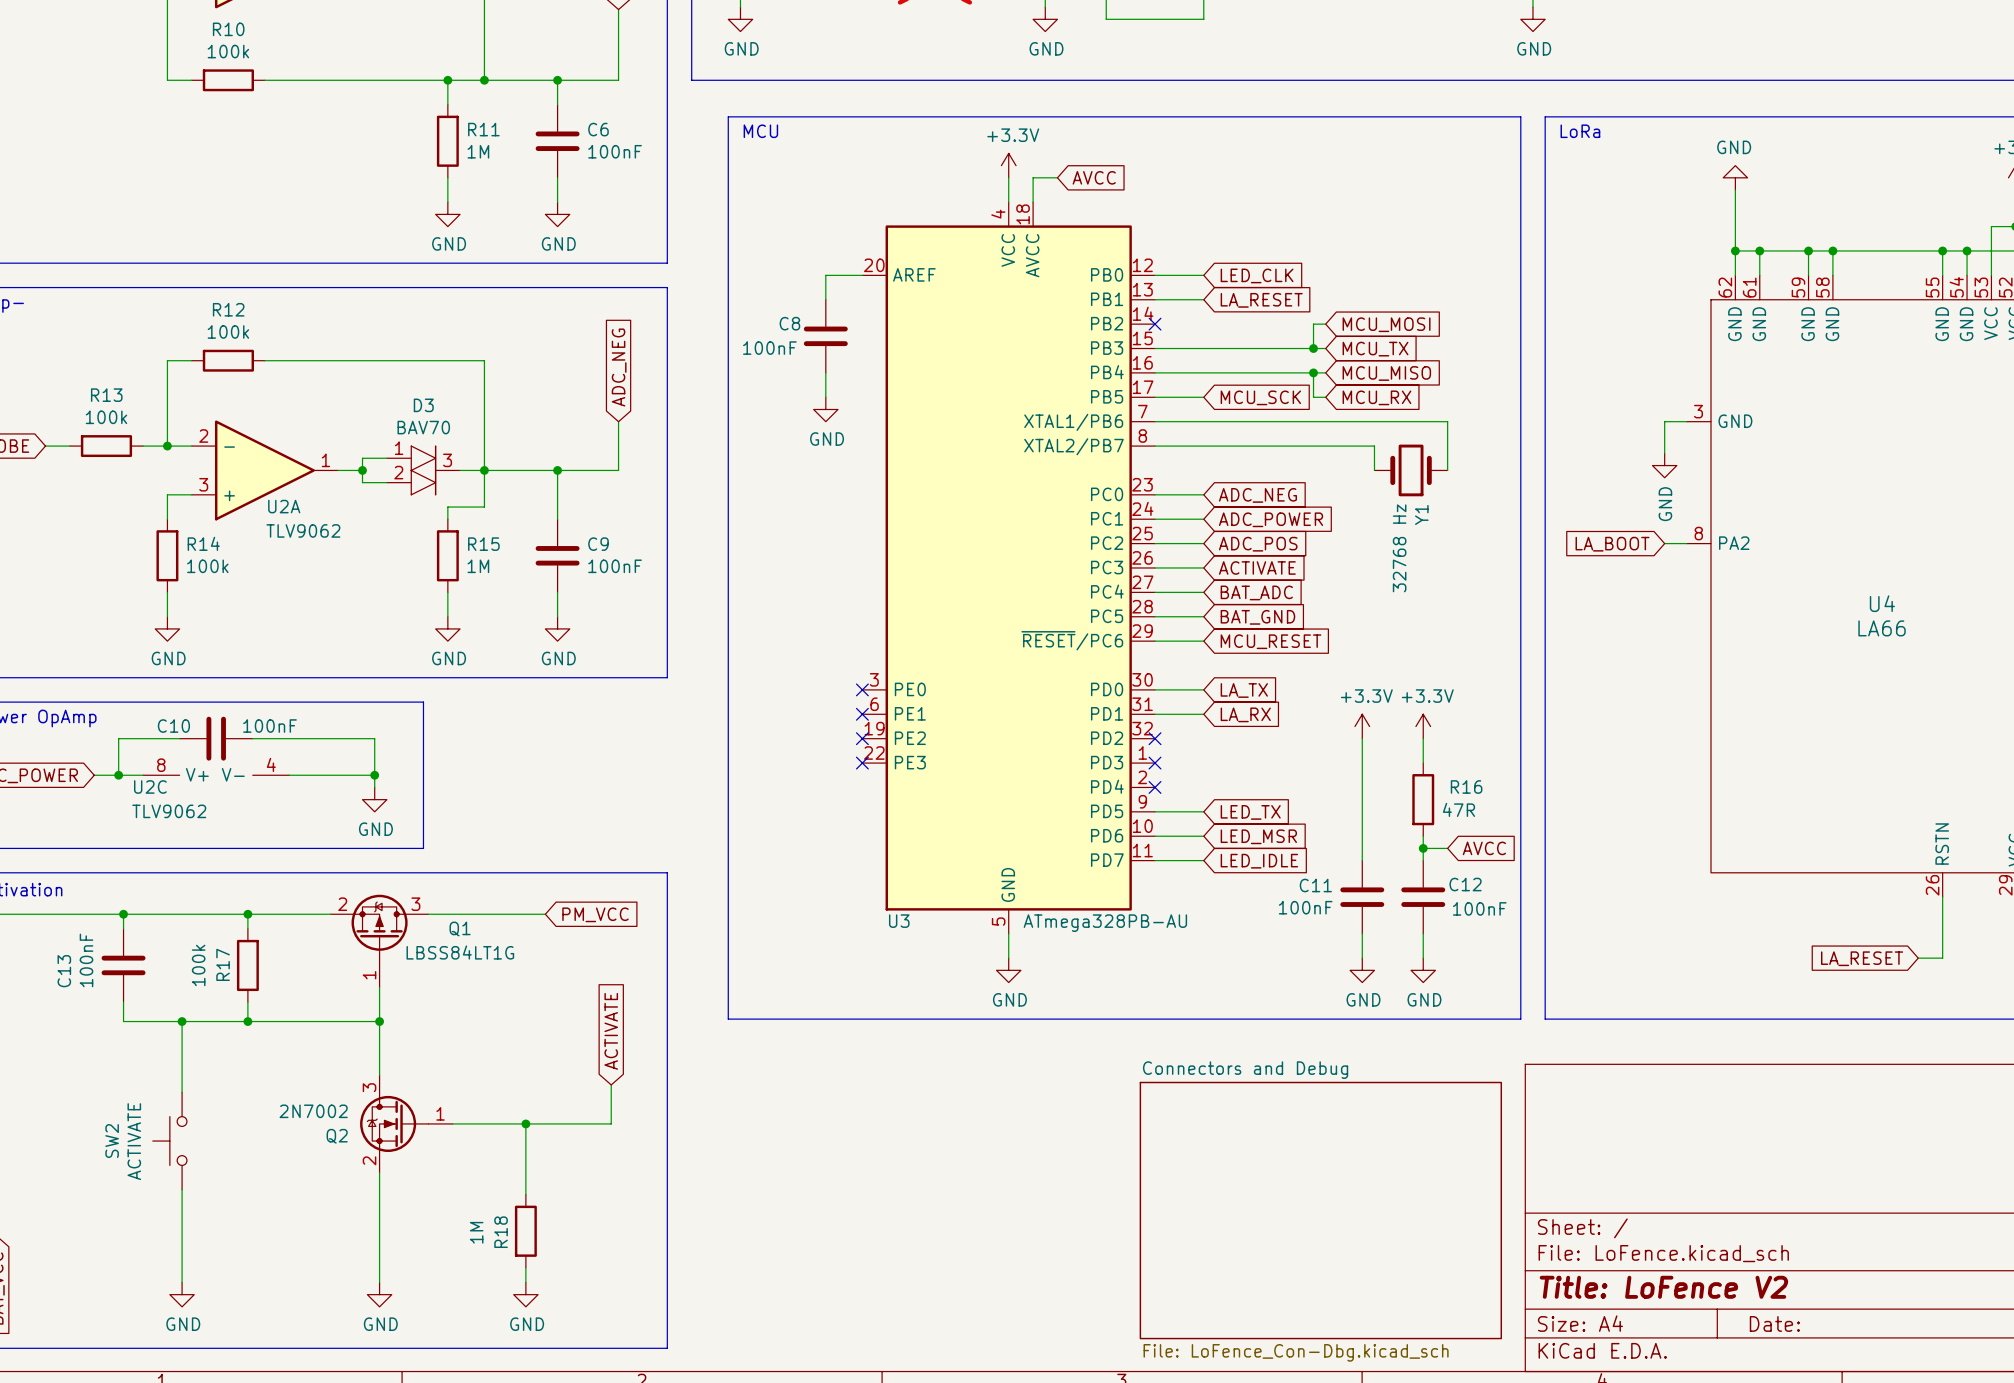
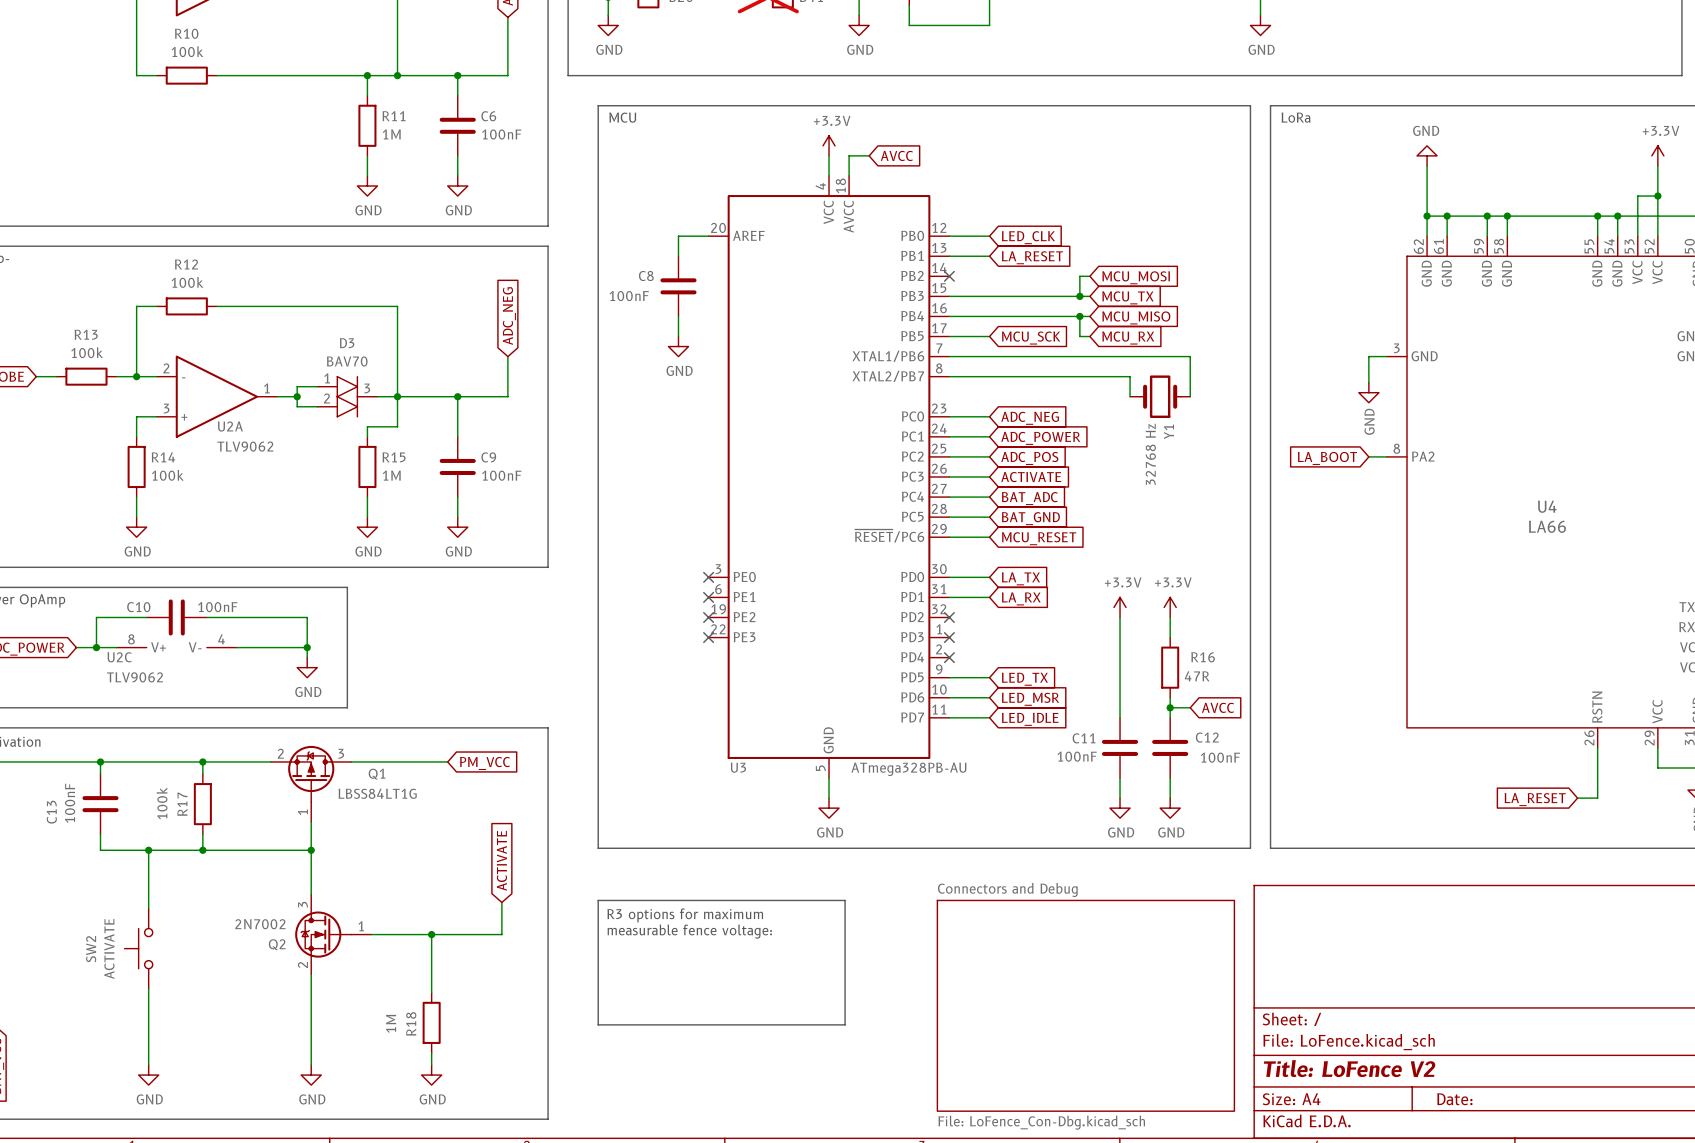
line: none -> (598, 900) (845, 900) (845, 1024) (598, 1024) (598, 900)
text: none -> R3 options for maximum (685, 915)
text: none -> measurable fence voltage: (689, 931)

